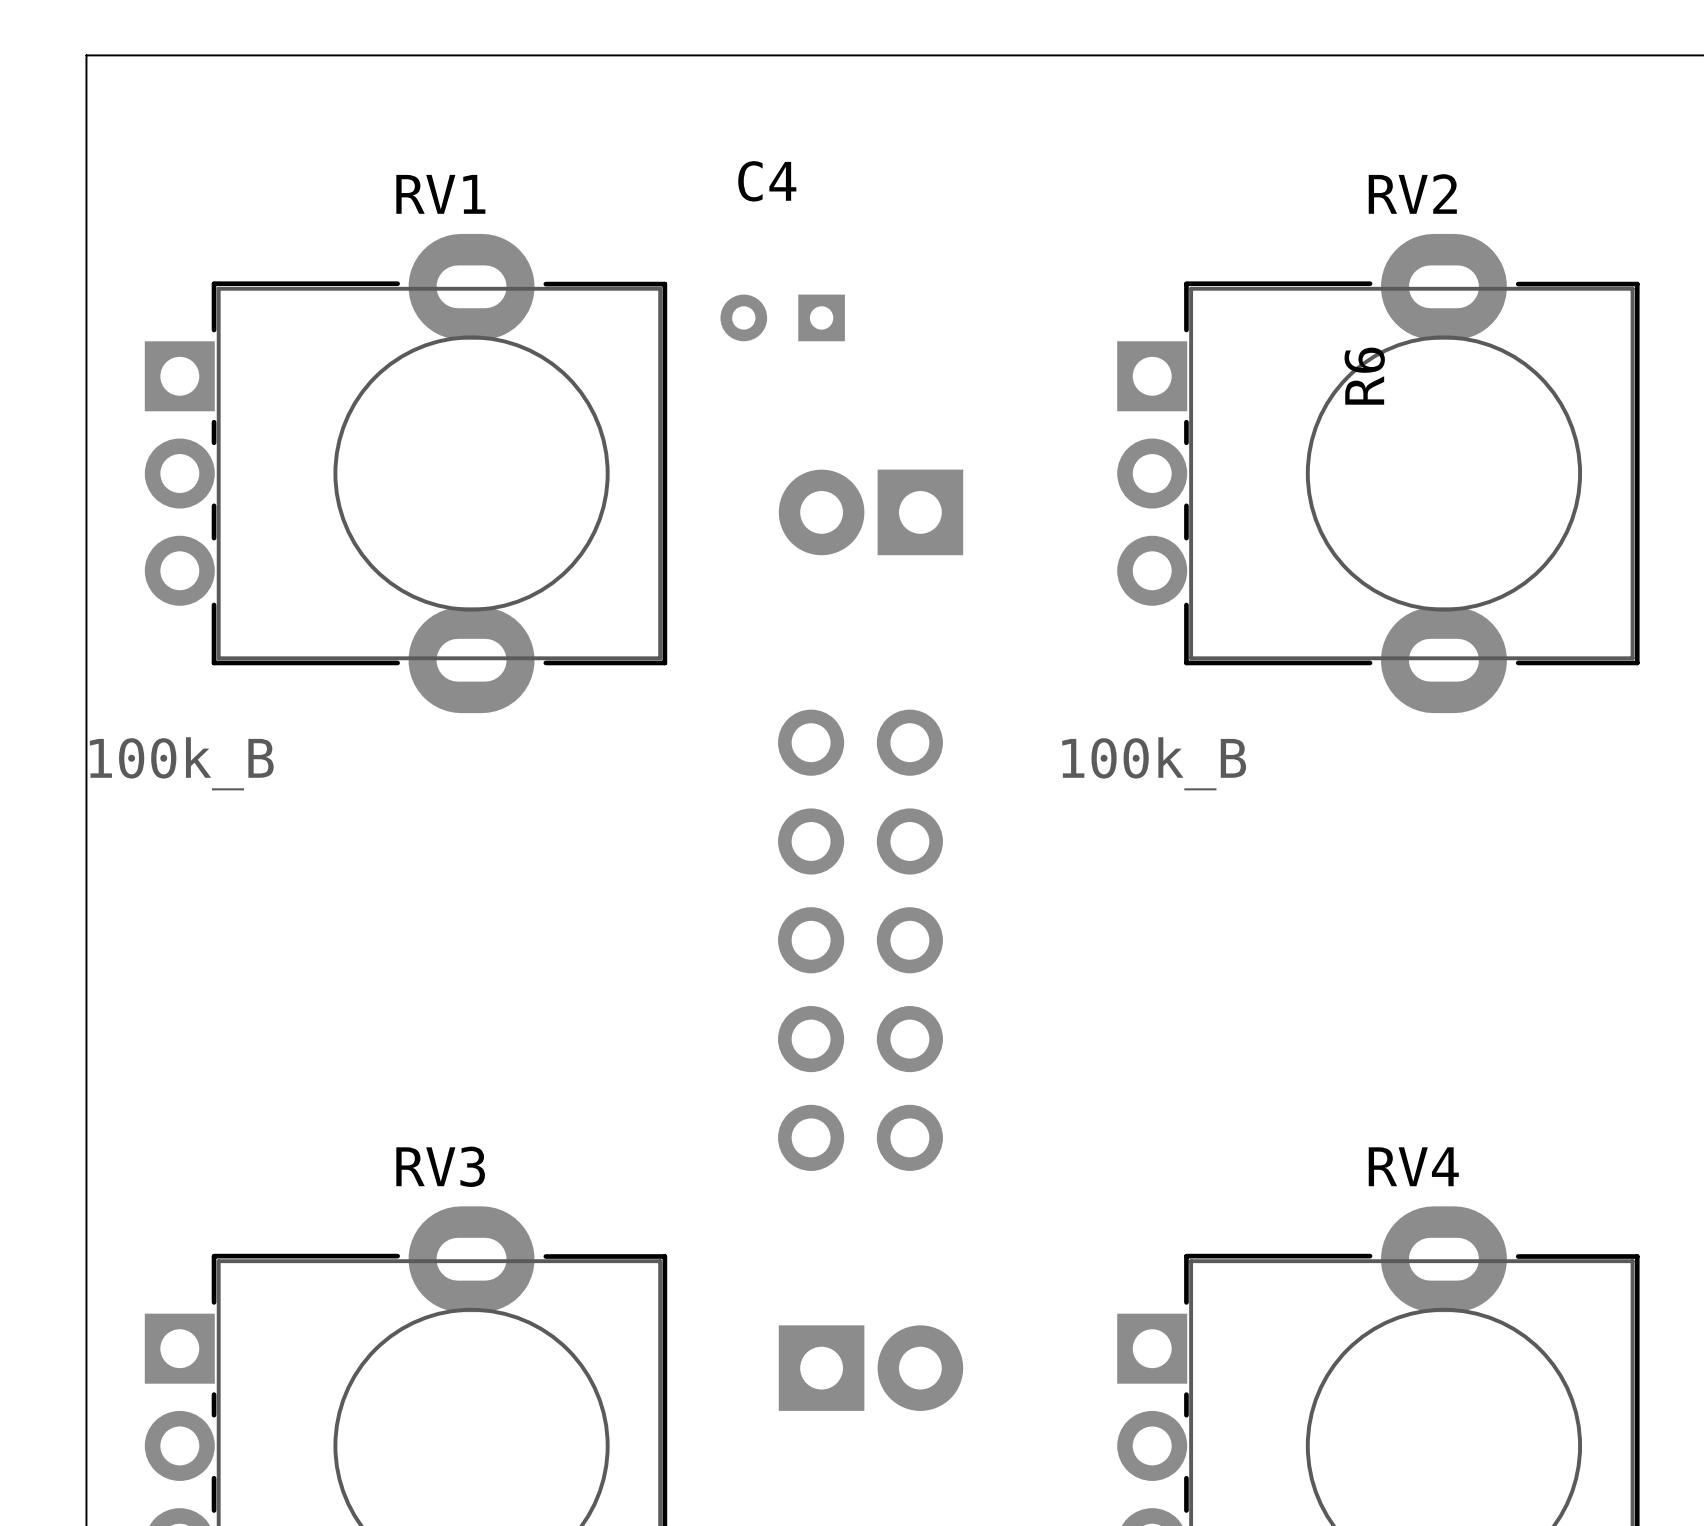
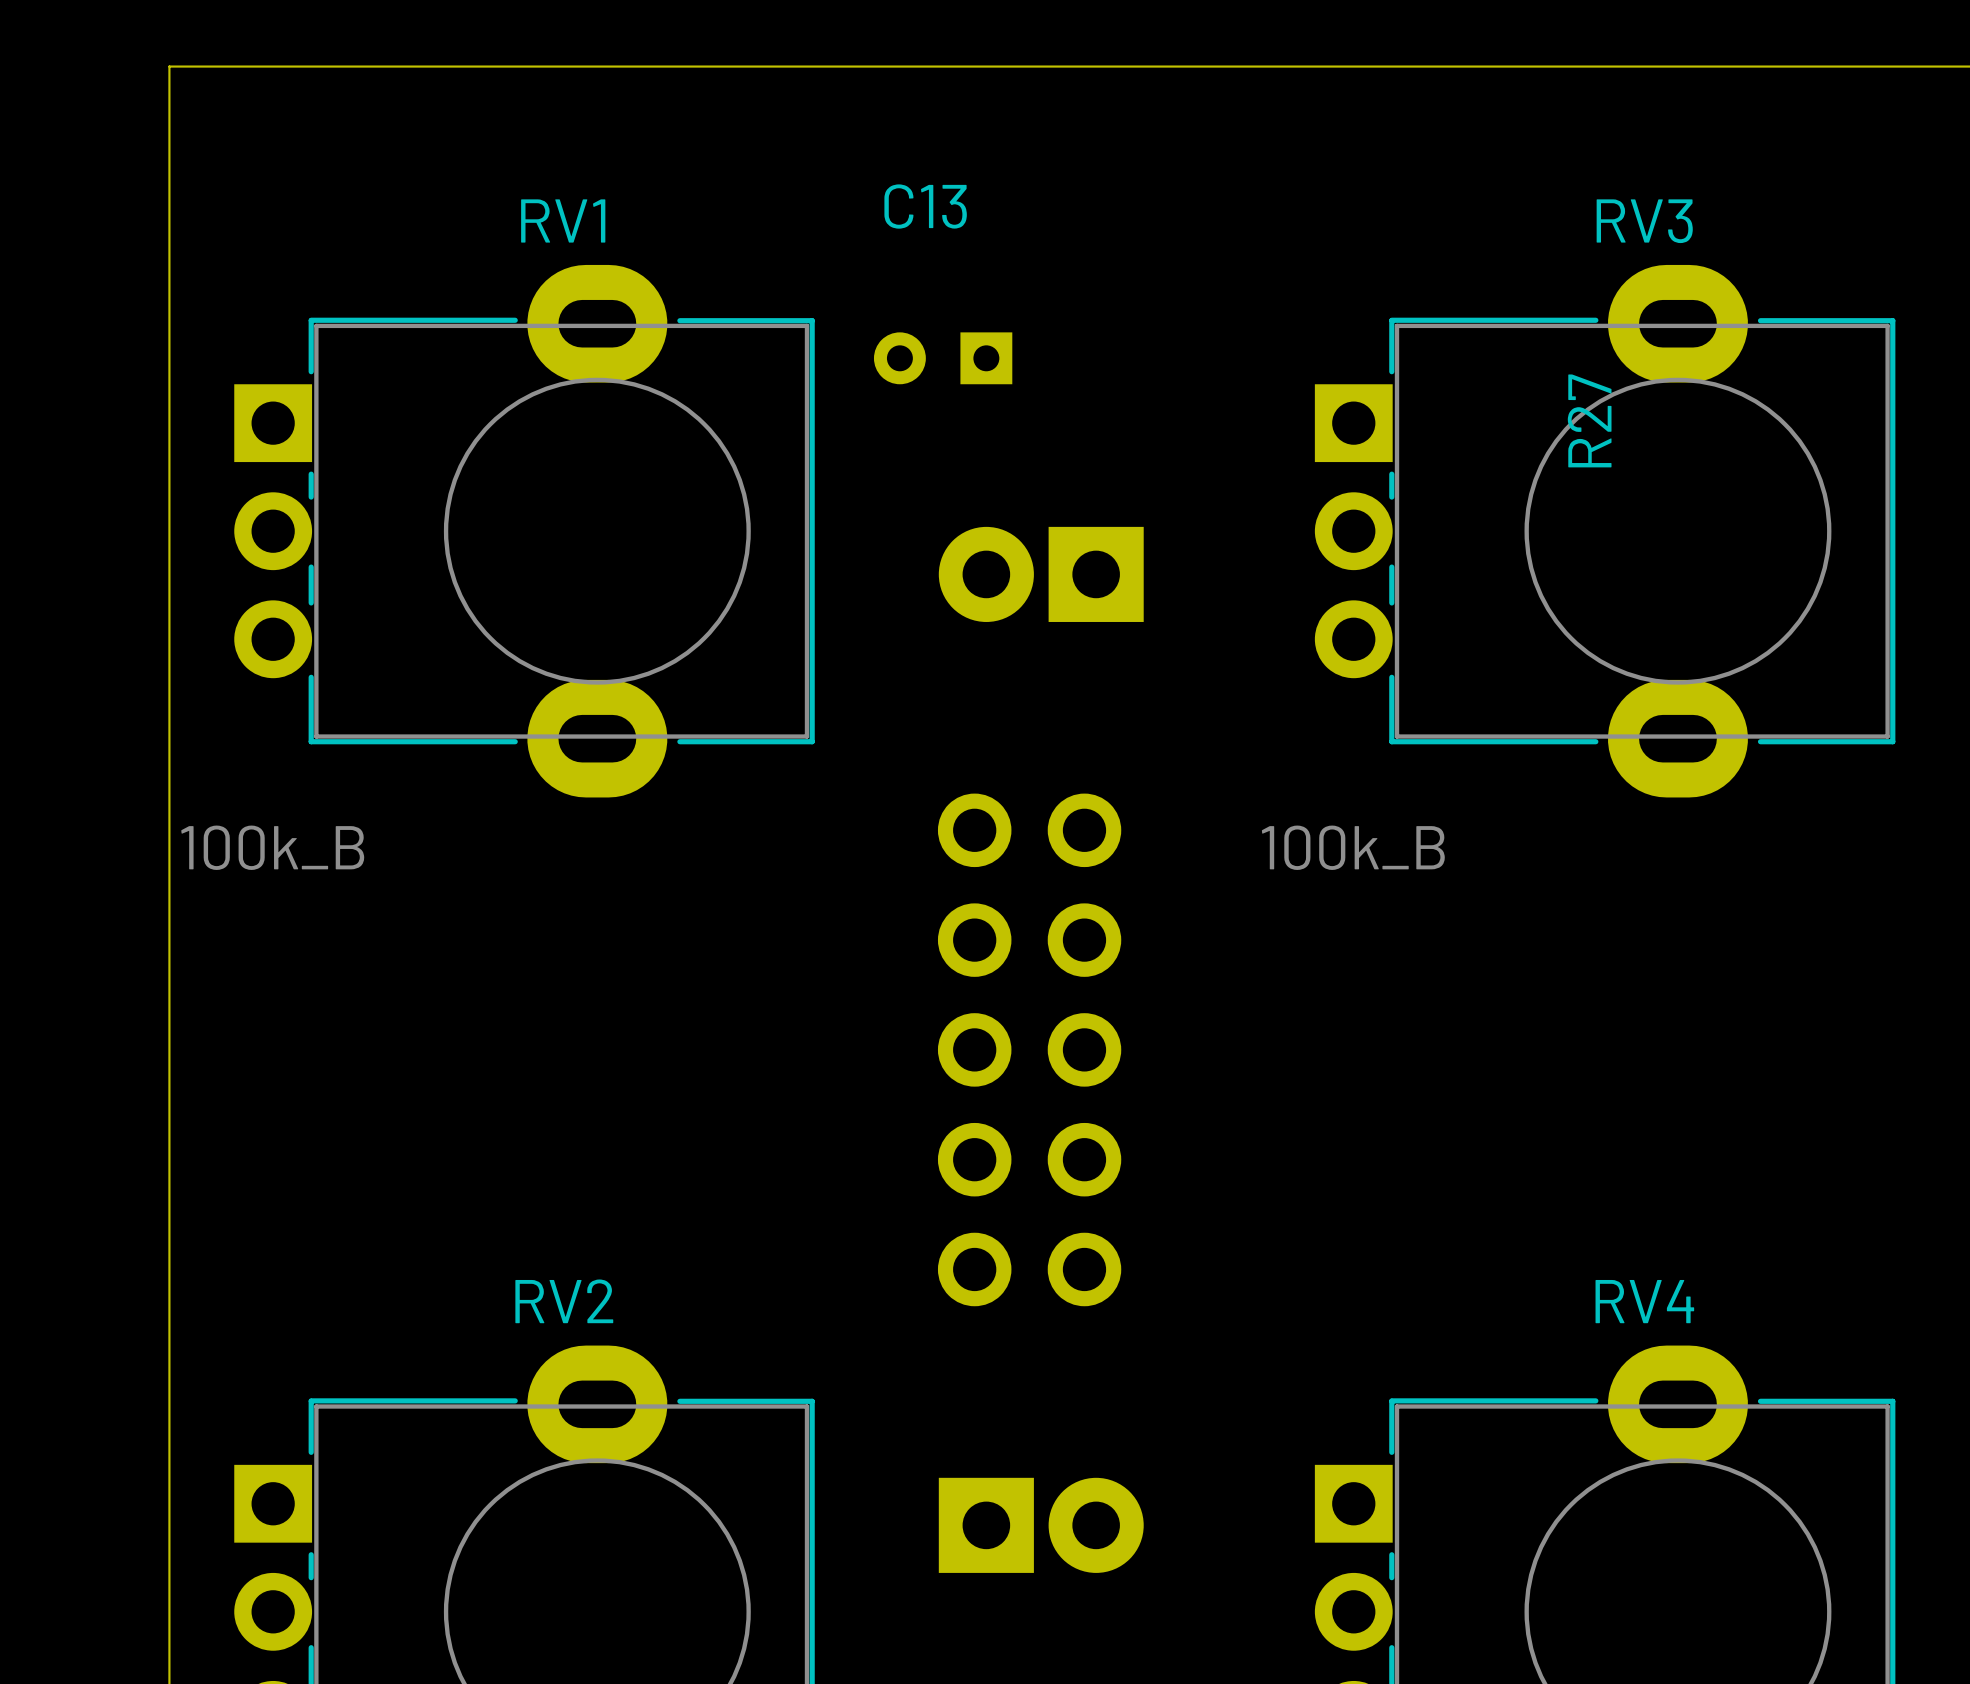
C4 name: C4 (767, 181) -> C13 (925, 206)
RV2 name: RV2 (1412, 194) -> RV3 (1644, 221)
R6 name: R6 (1364, 376) -> R27 (1589, 420)
RV3 name: RV3 (440, 1166) -> RV2 (564, 1301)

